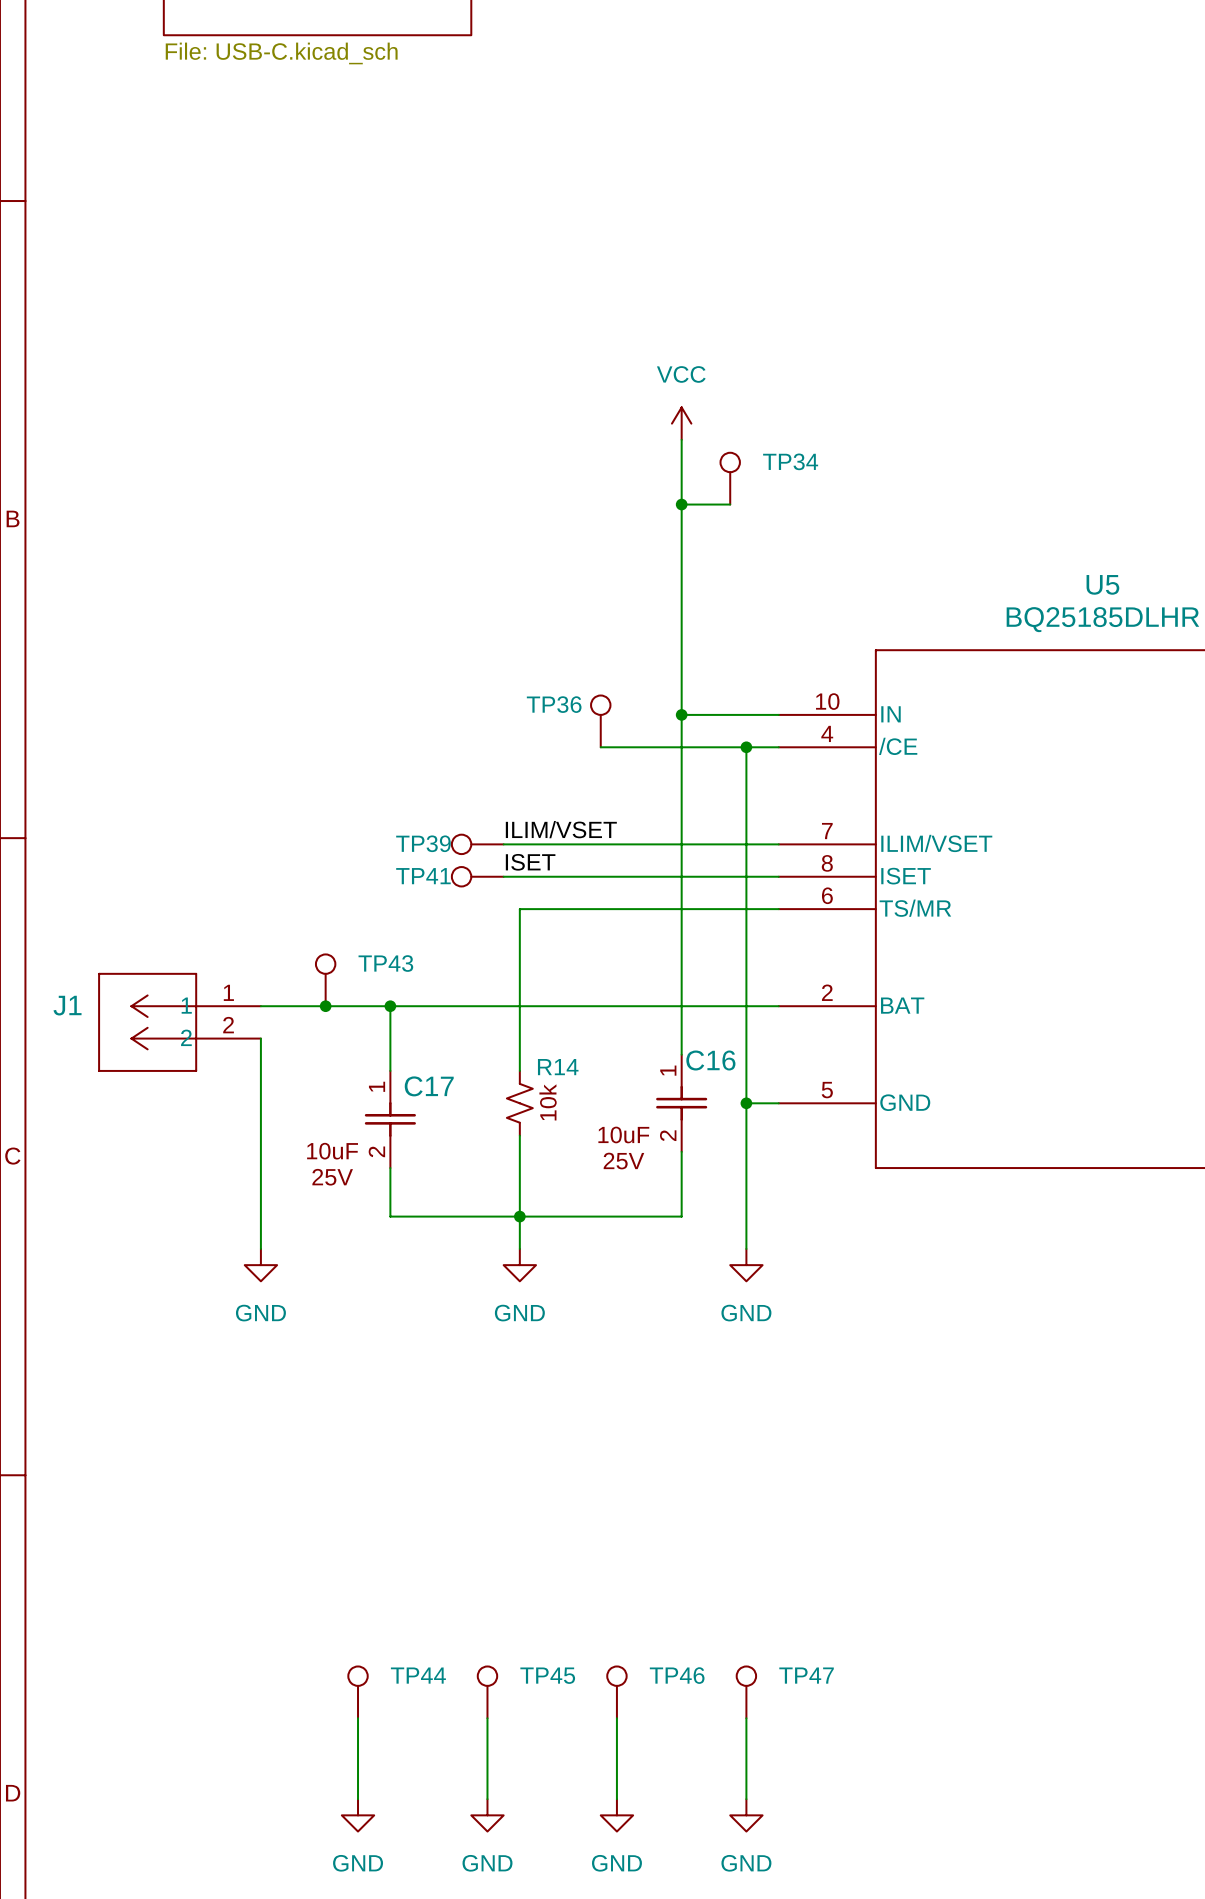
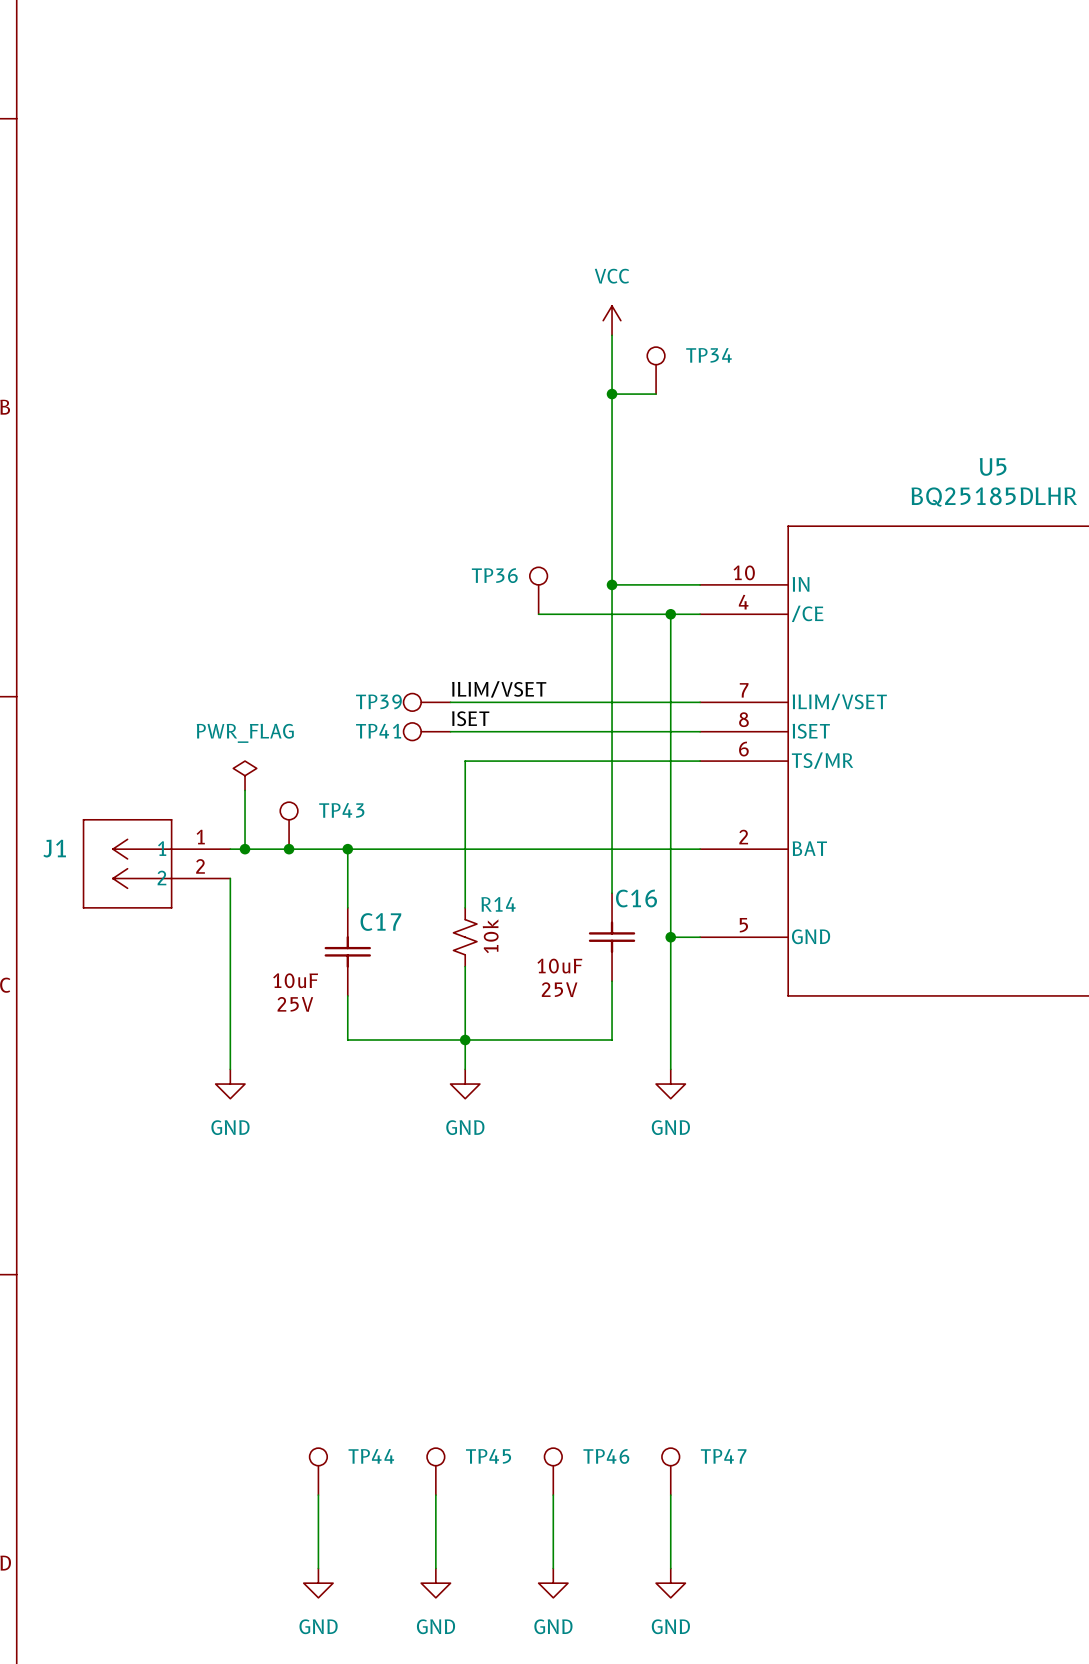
power symbol: none -> PWR_FLAG (245, 775)
wire: none -> (245, 790) (245, 849)
junction: none -> (245, 849)
C16 pin number: 1 (668, 1070) -> none
C17 pin number: 1 (377, 1086) -> none
C16 pin number: 2 (668, 1135) -> none
C17 pin number: 2 (376, 1151) -> none

